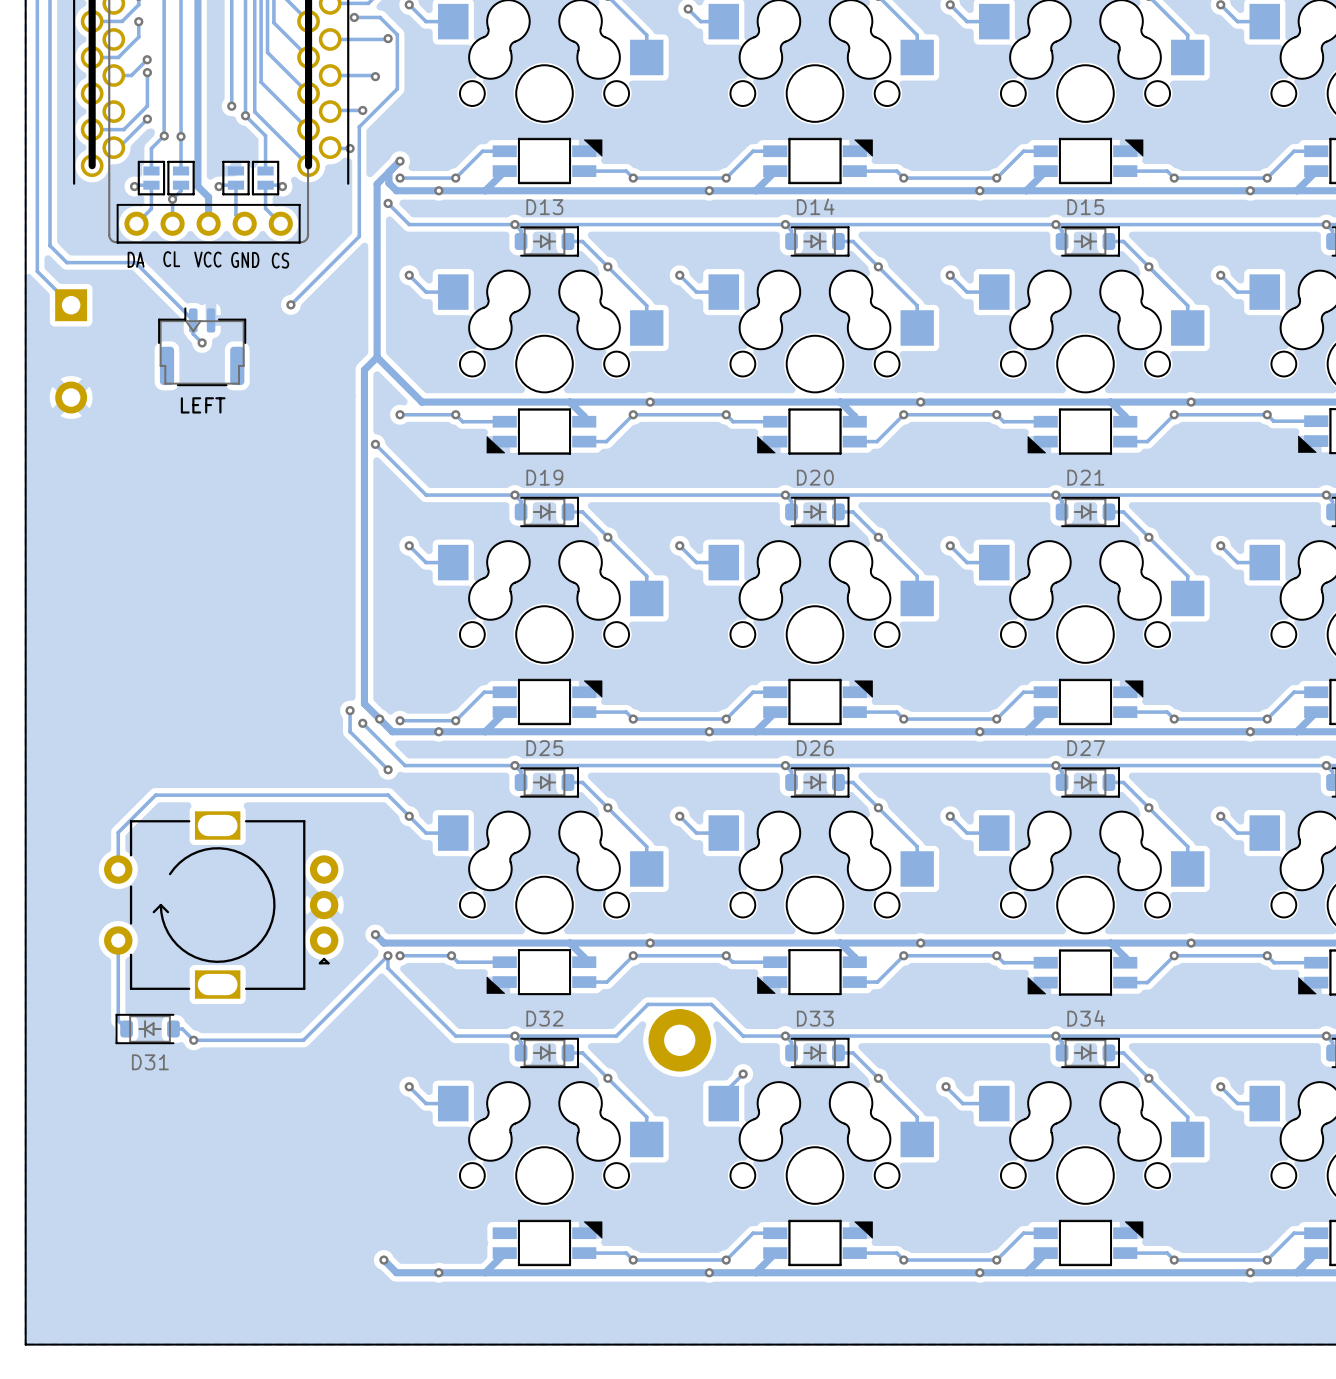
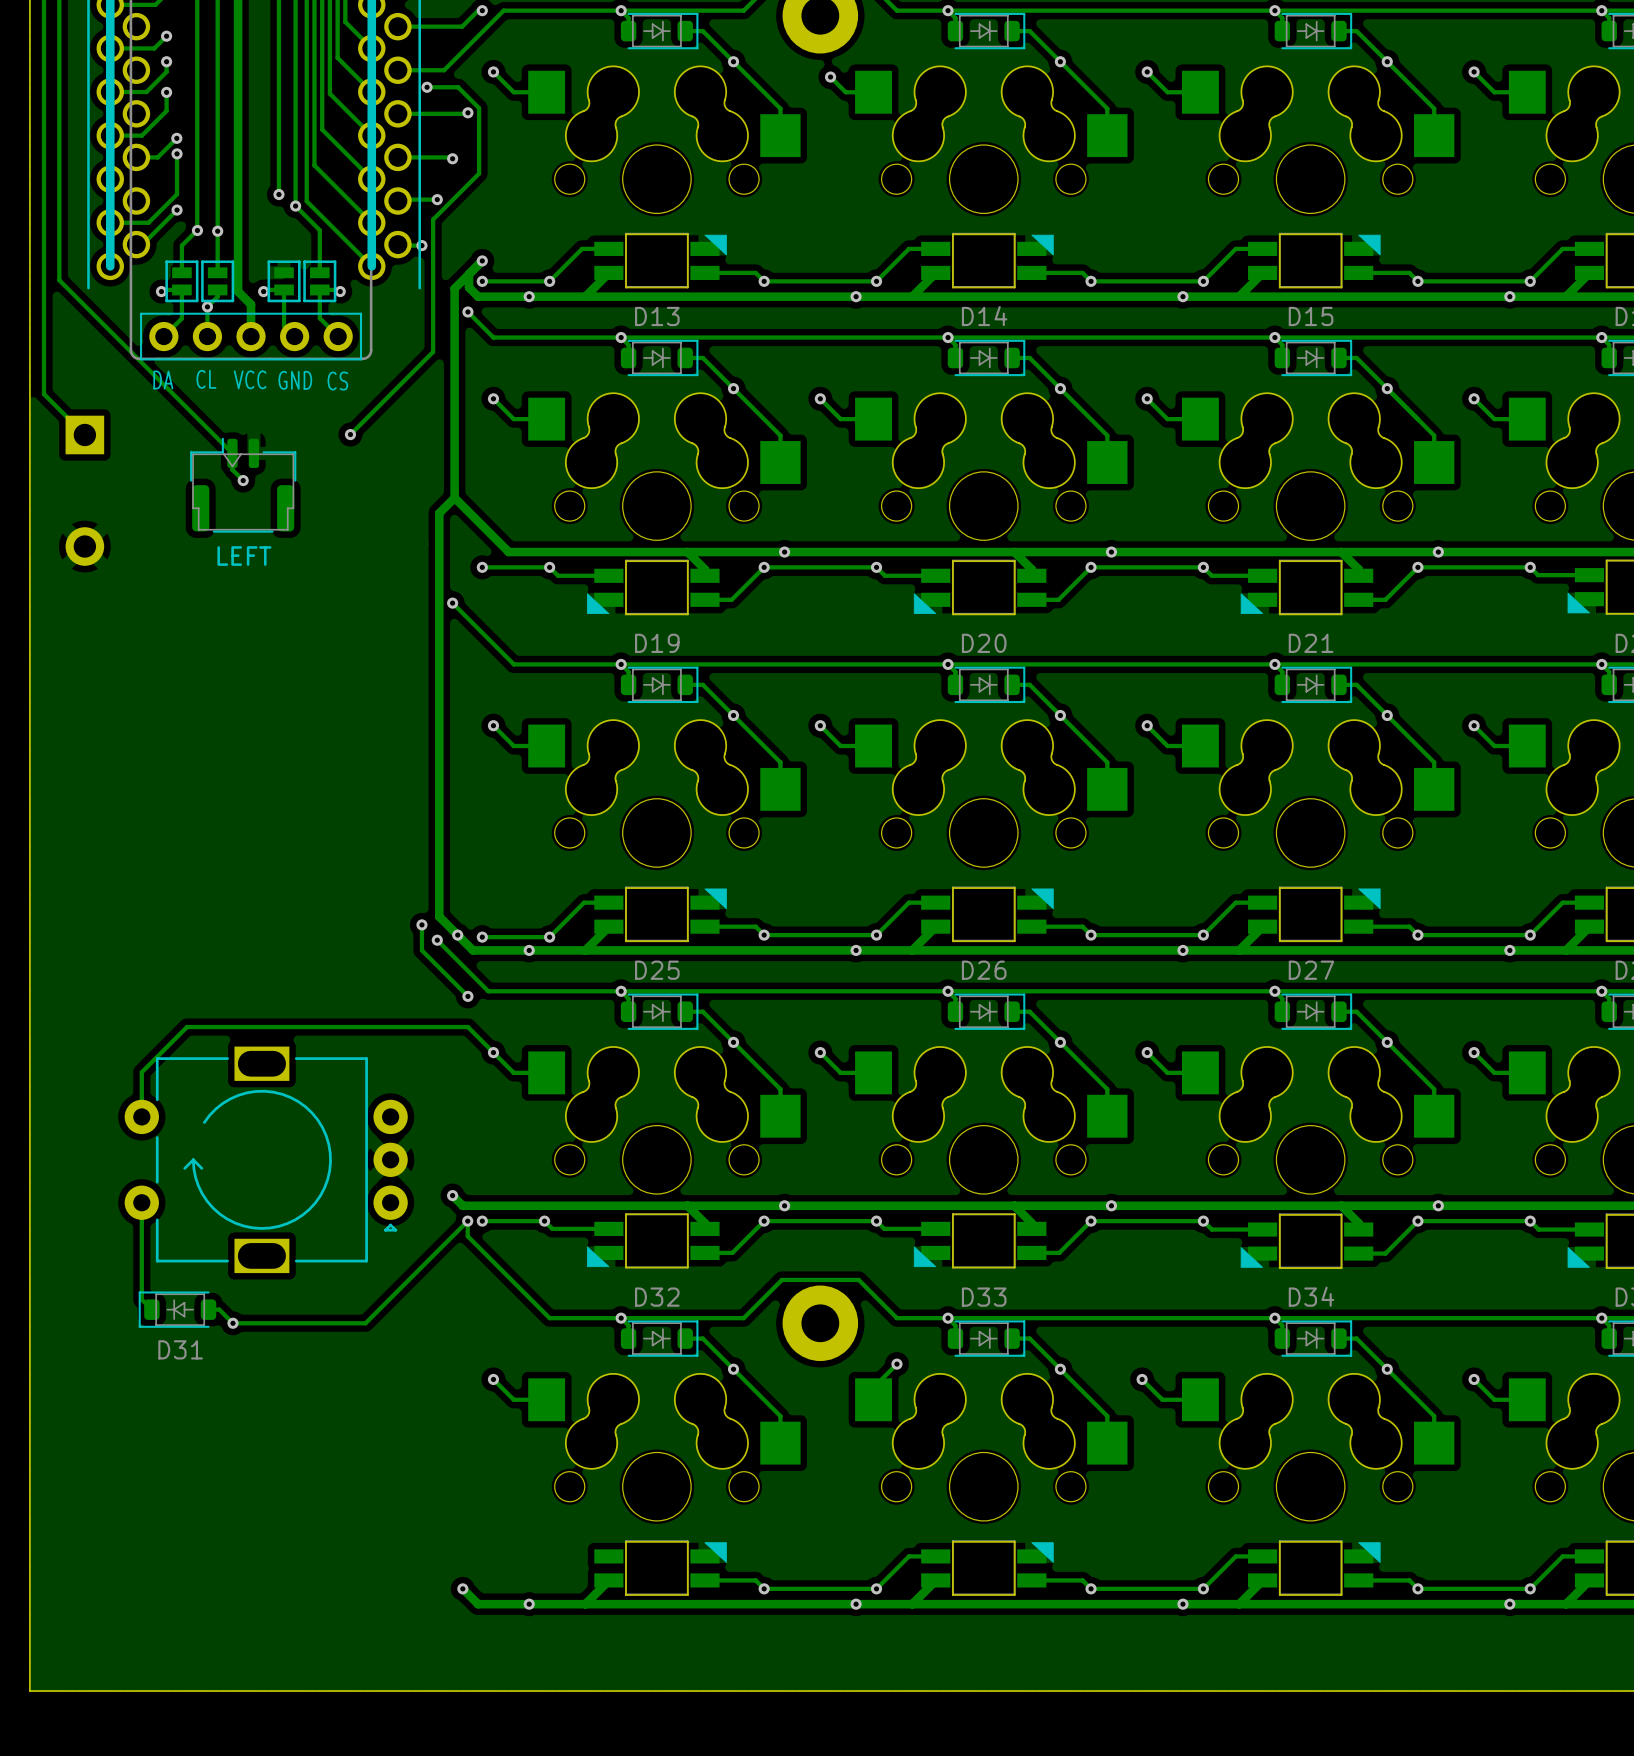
track: (50, 177) (50, 245) (66, 262) (135, 262) -> (59, 280) (162, 383)

